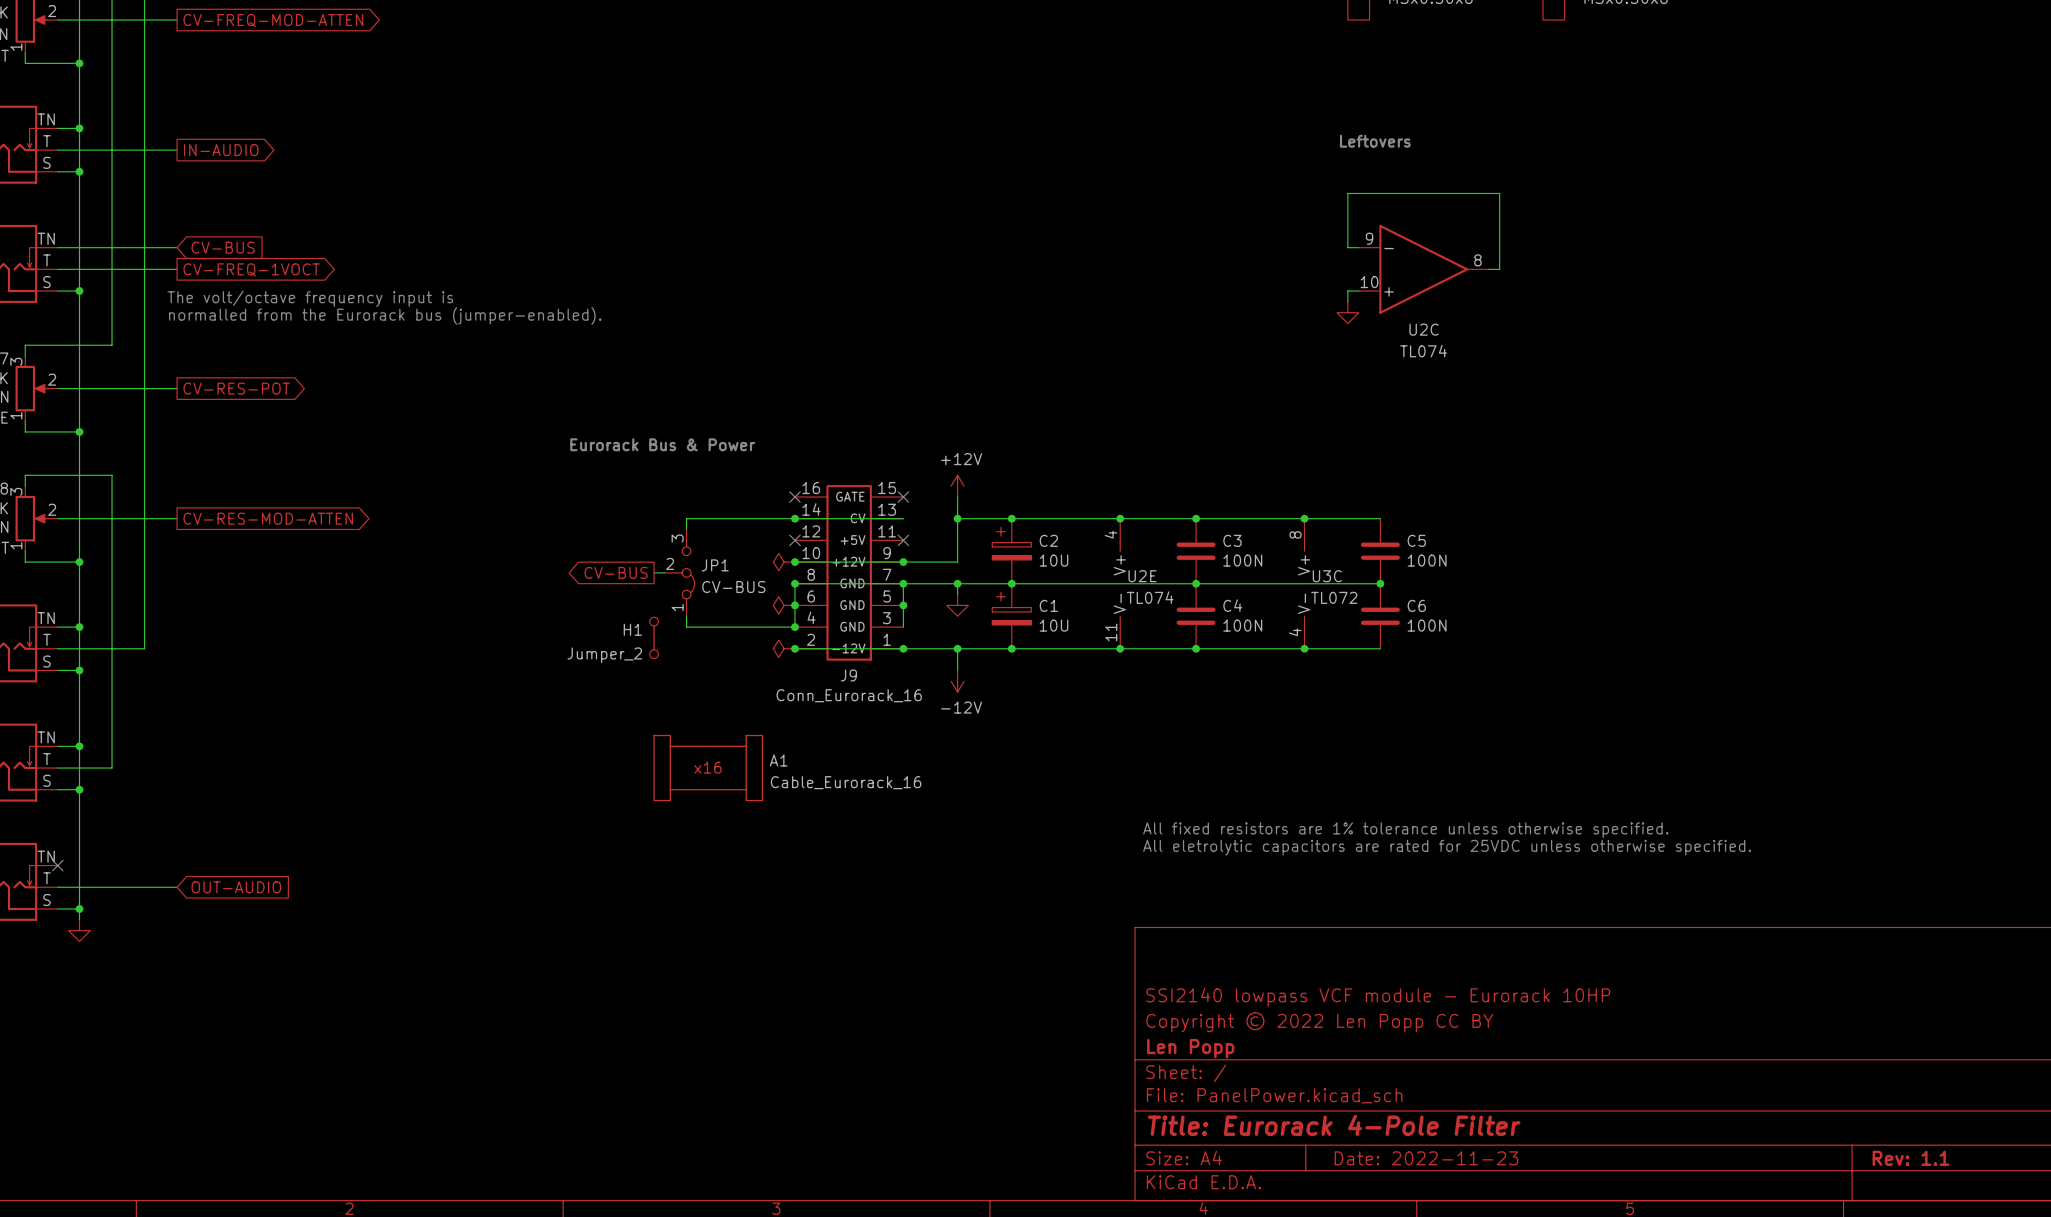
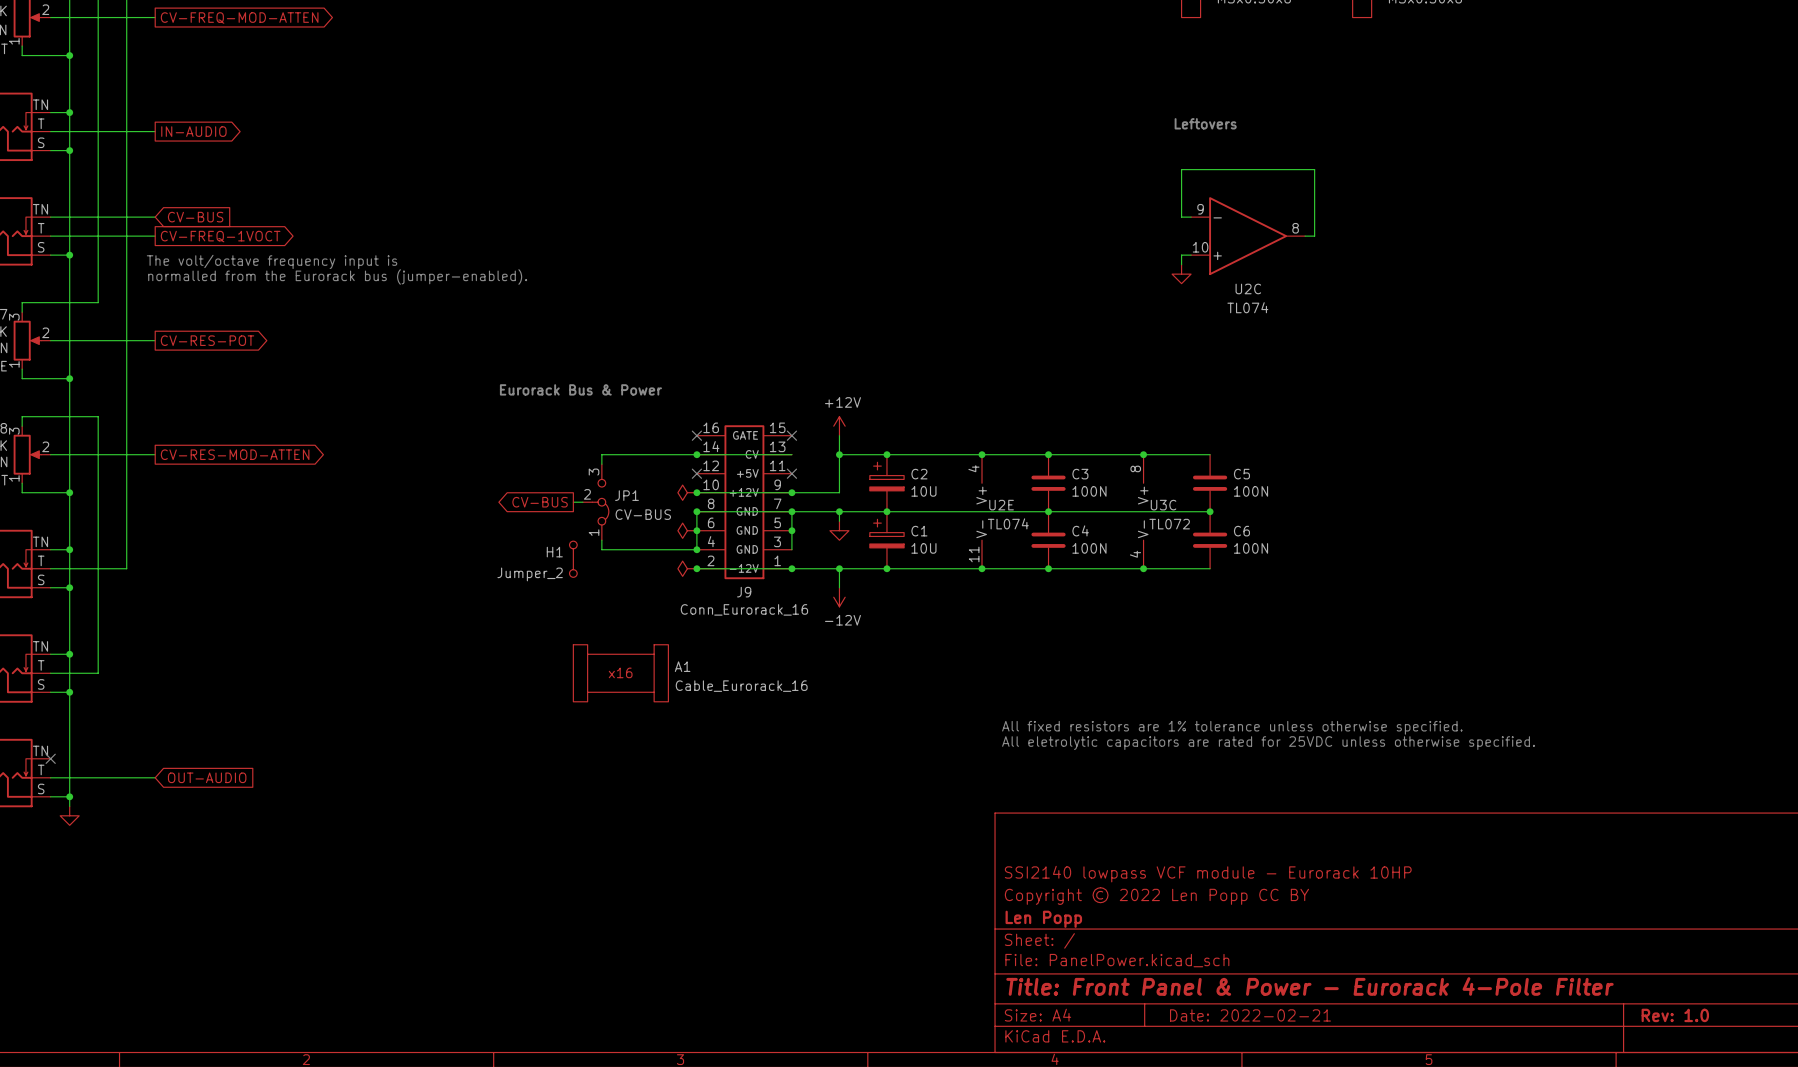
title block: Title: Eurorack 4-Pole Filter (1334, 1125) -> Title: Front Panel & Power - Eurorack 4-Pole Filter (1309, 986)
title block: Date: 2022-11-23 (1426, 1158) -> Date: 2022-02-21 (1250, 1015)
title block: Rev: 1.1 (1911, 1158) -> Rev: 1.0 (1675, 1015)

